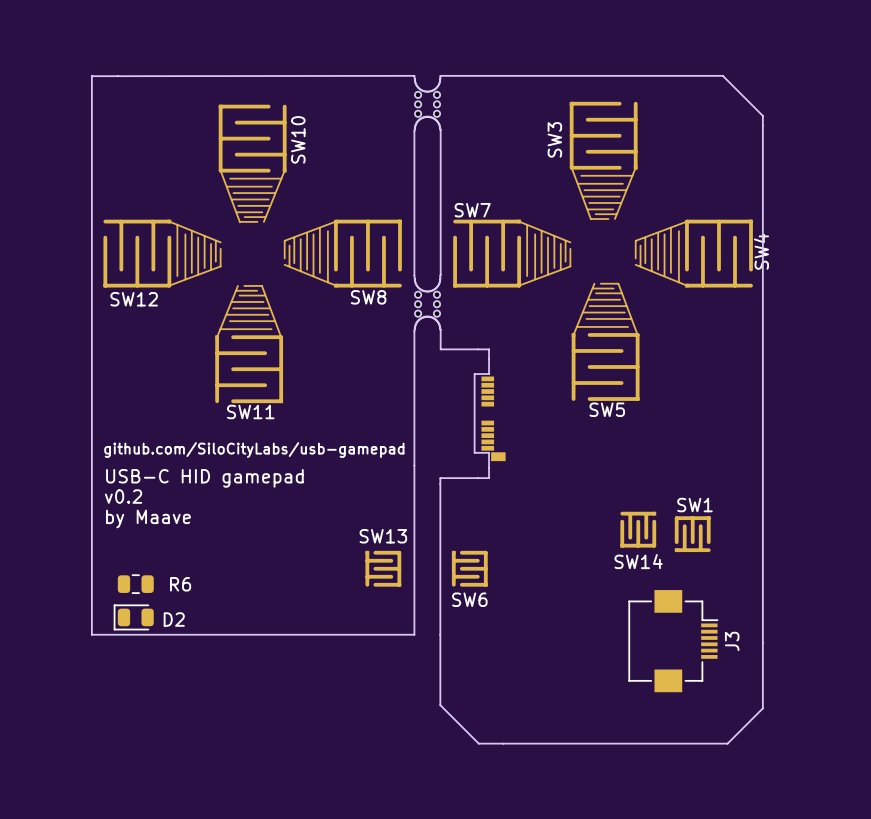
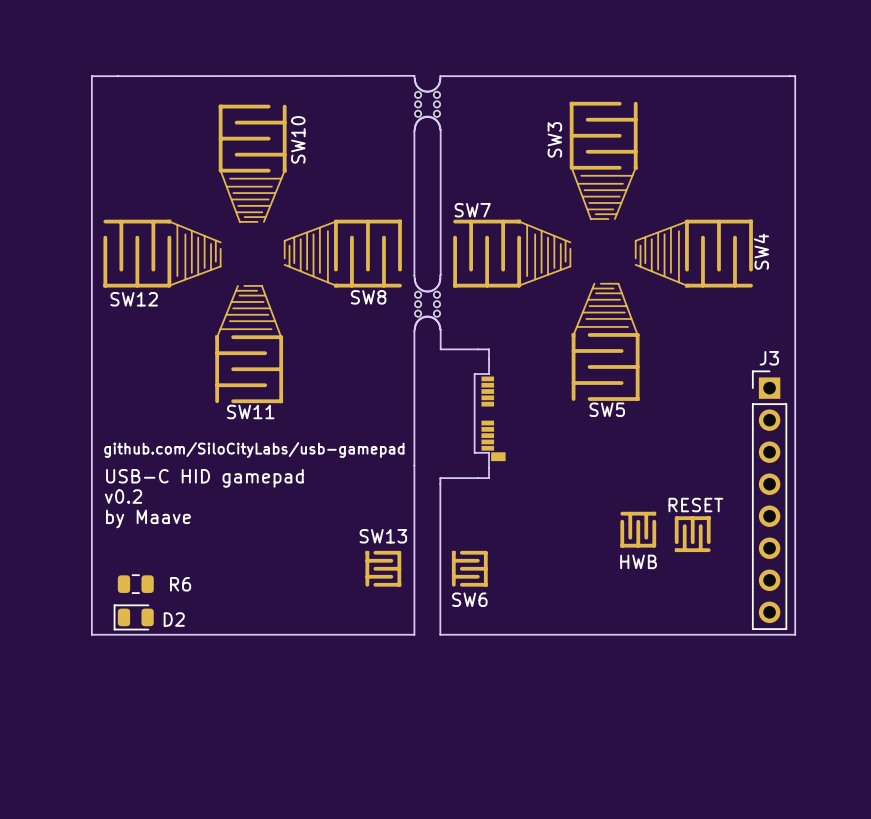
board edge: (440, 76) (722, 75) (762, 115) (762, 708) (727, 743) (478, 743) (440, 705) (440, 634) -> (440, 76) (795, 76) (795, 634) (440, 634)
SW1 name: SW1 (694, 505) -> RESET (695, 505)
SW14 name: SW14 (638, 561) -> HWB (638, 561)
J3 footprint: [628, 590, 719, 693] -> [752, 370, 788, 630]
J3 name position: J3 (732, 641) -> J3 (769, 358)

